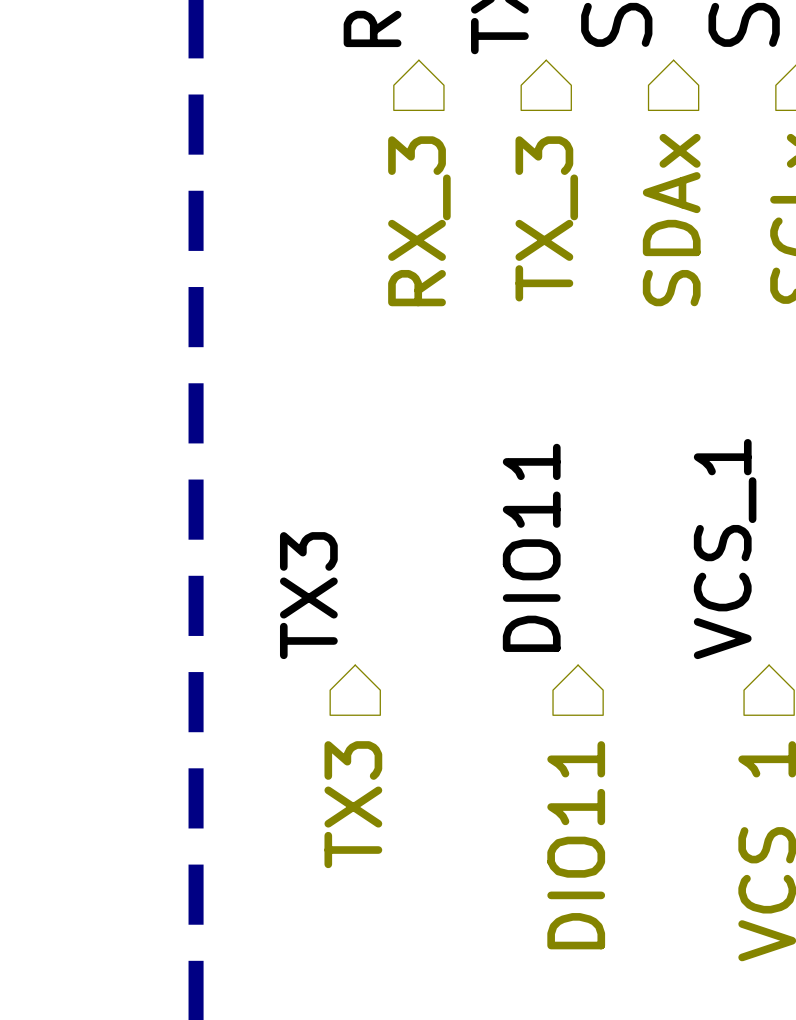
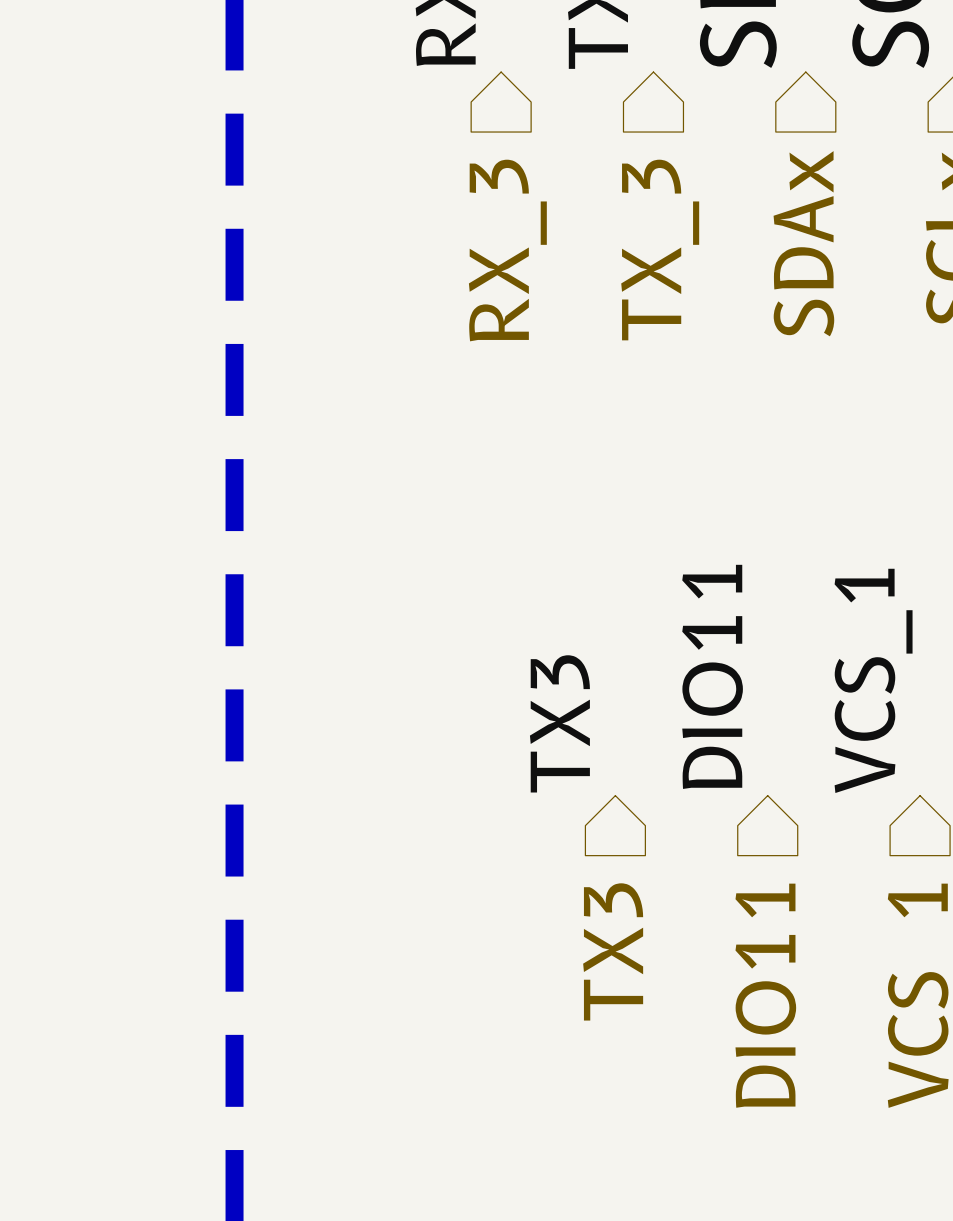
label position: DIO11 (531, 547) -> DIO11 (712, 676)
label position: TX3 (308, 595) -> TX3 (559, 723)
hierarchical label position: TX3 (353, 804) -> TX3 (613, 951)
hierarchical label position: DIO11 (576, 845) -> DIO11 (765, 995)

